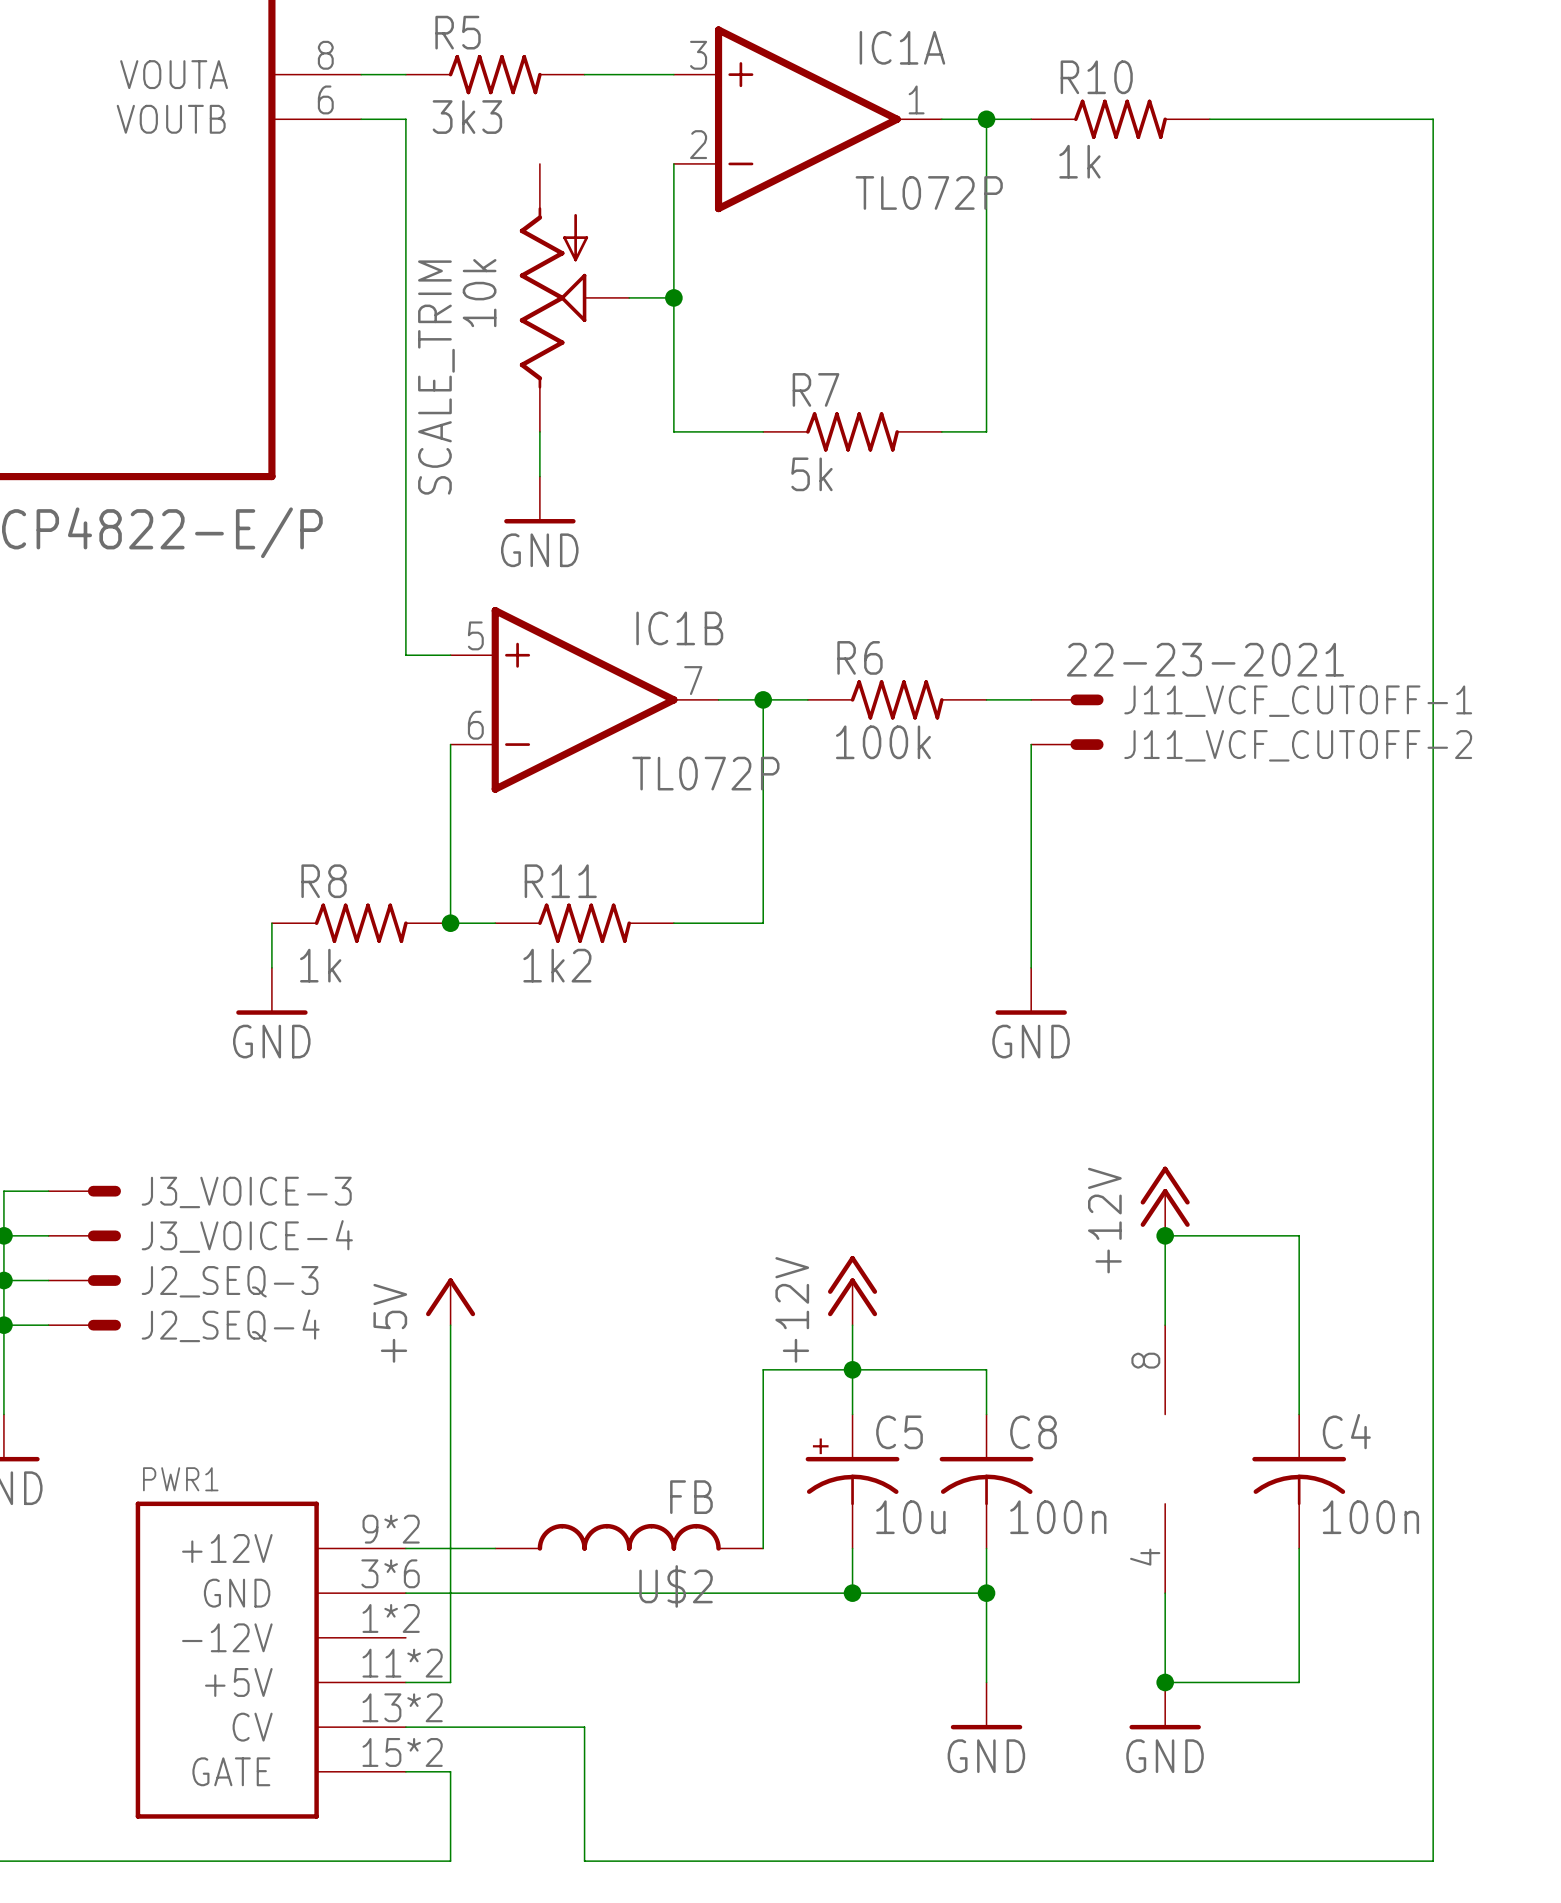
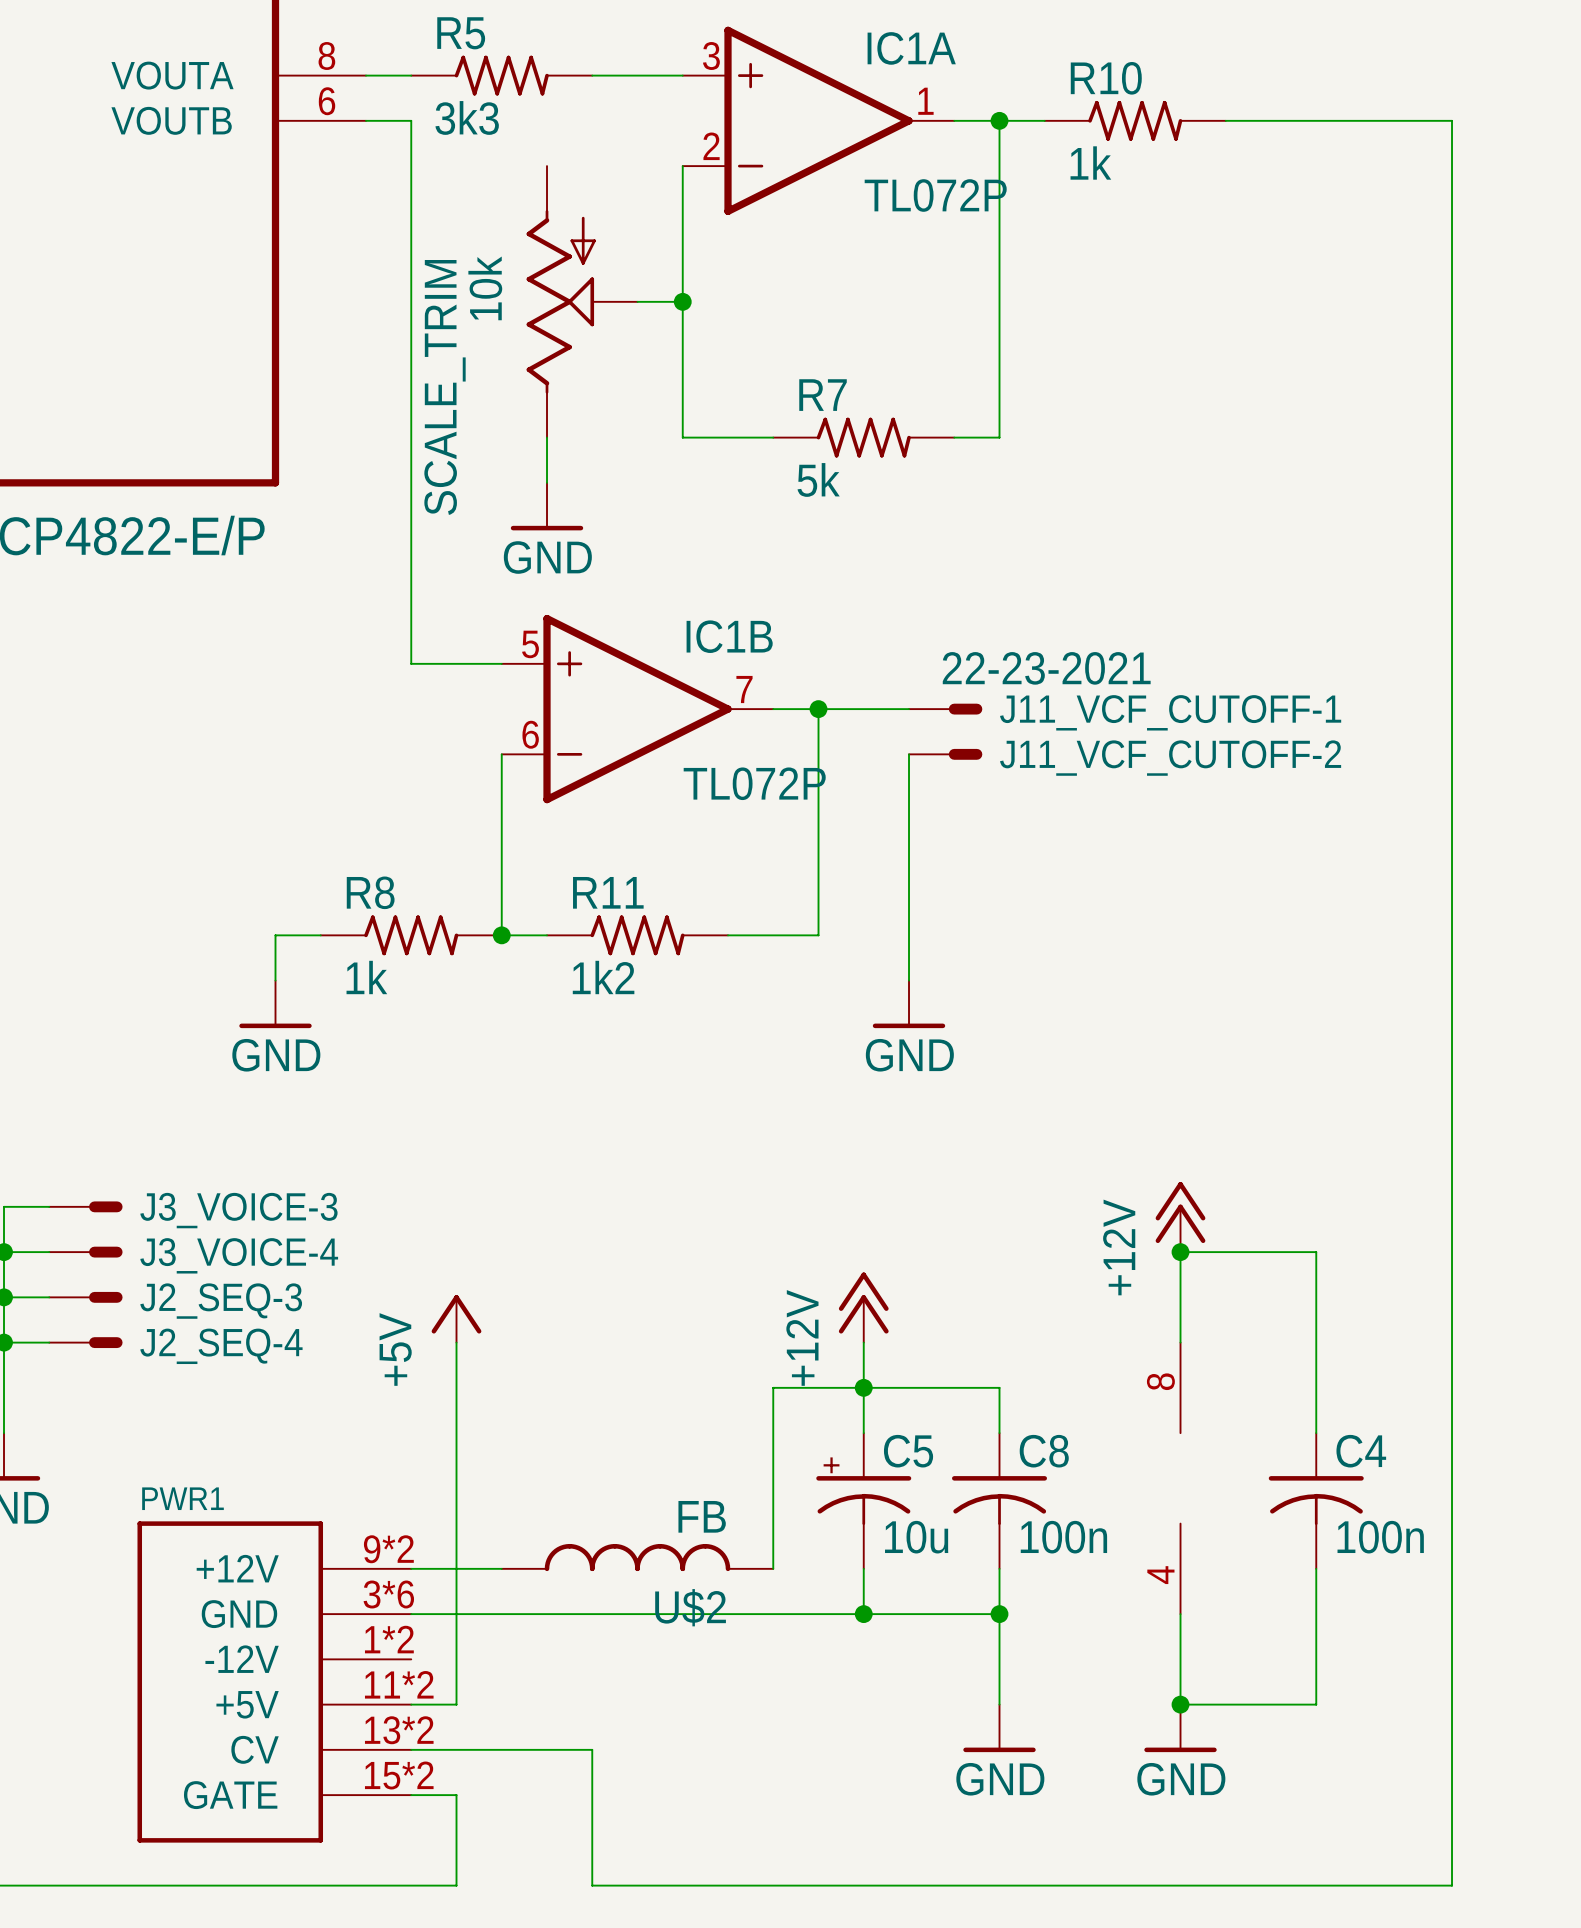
IC1B position: (584, 699) -> (637, 709)
wire: (718, 699) (763, 699) (763, 923) -> (909, 709) (818, 709) (818, 935) (773, 935)
junction position: (763, 699) -> (818, 709)
R6: 100k (897, 699) -> none
wire: (986, 699) (1031, 699) -> none
J11_VCF_CUTOFF-1 position: (1067, 699) -> (945, 709)
wire: (450, 744) (450, 923) (495, 923) -> (501, 754) (501, 935) (547, 935)
wire: (1031, 744) (1031, 967) -> (909, 754) (909, 980)
J11_VCF_CUTOFF-2 position: (1067, 744) -> (945, 754)
R8 position: (361, 923) -> (411, 935)
junction position: (450, 923) -> (501, 935)
R11 position: (584, 923) -> (637, 935)
power symbol position: GND (1031, 991) -> GND (909, 1004)

